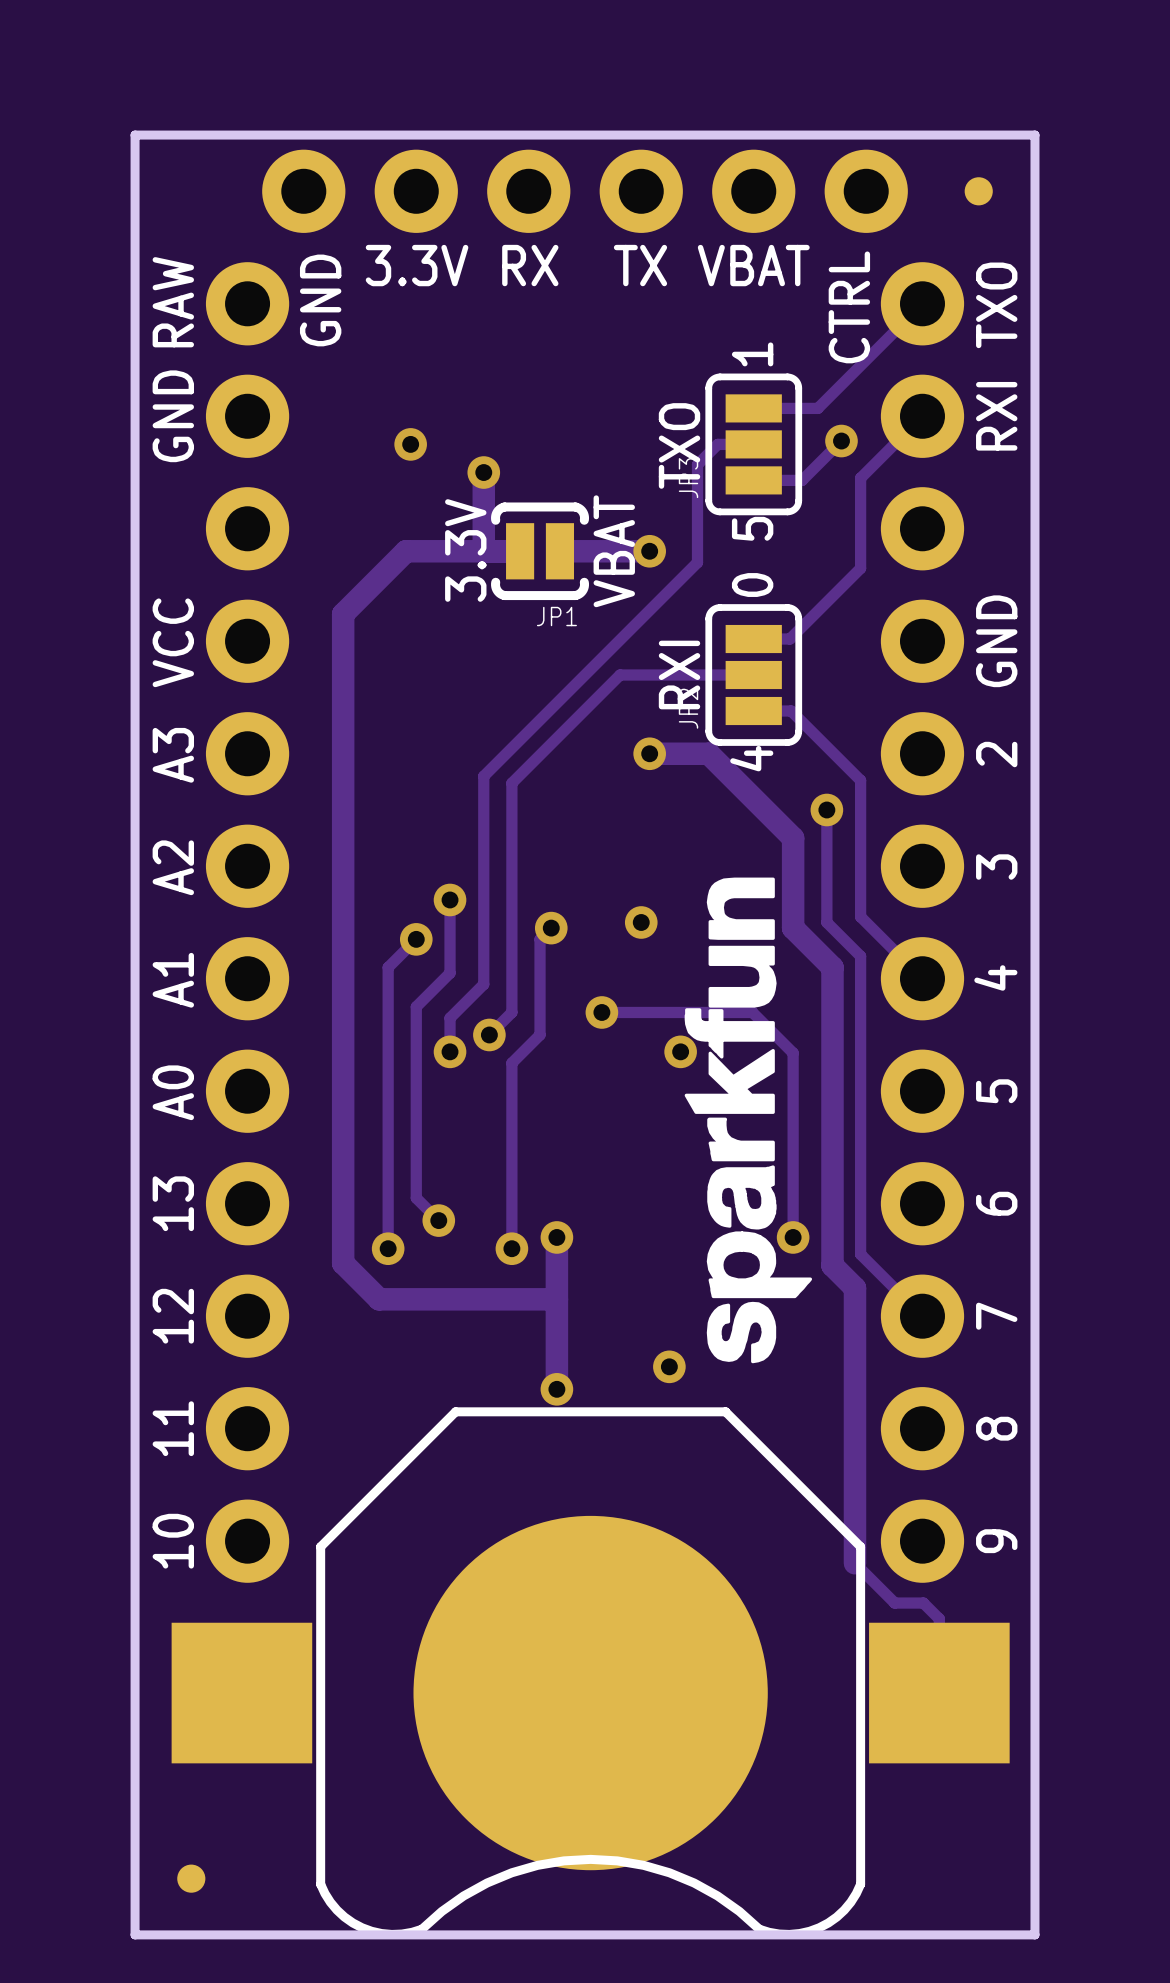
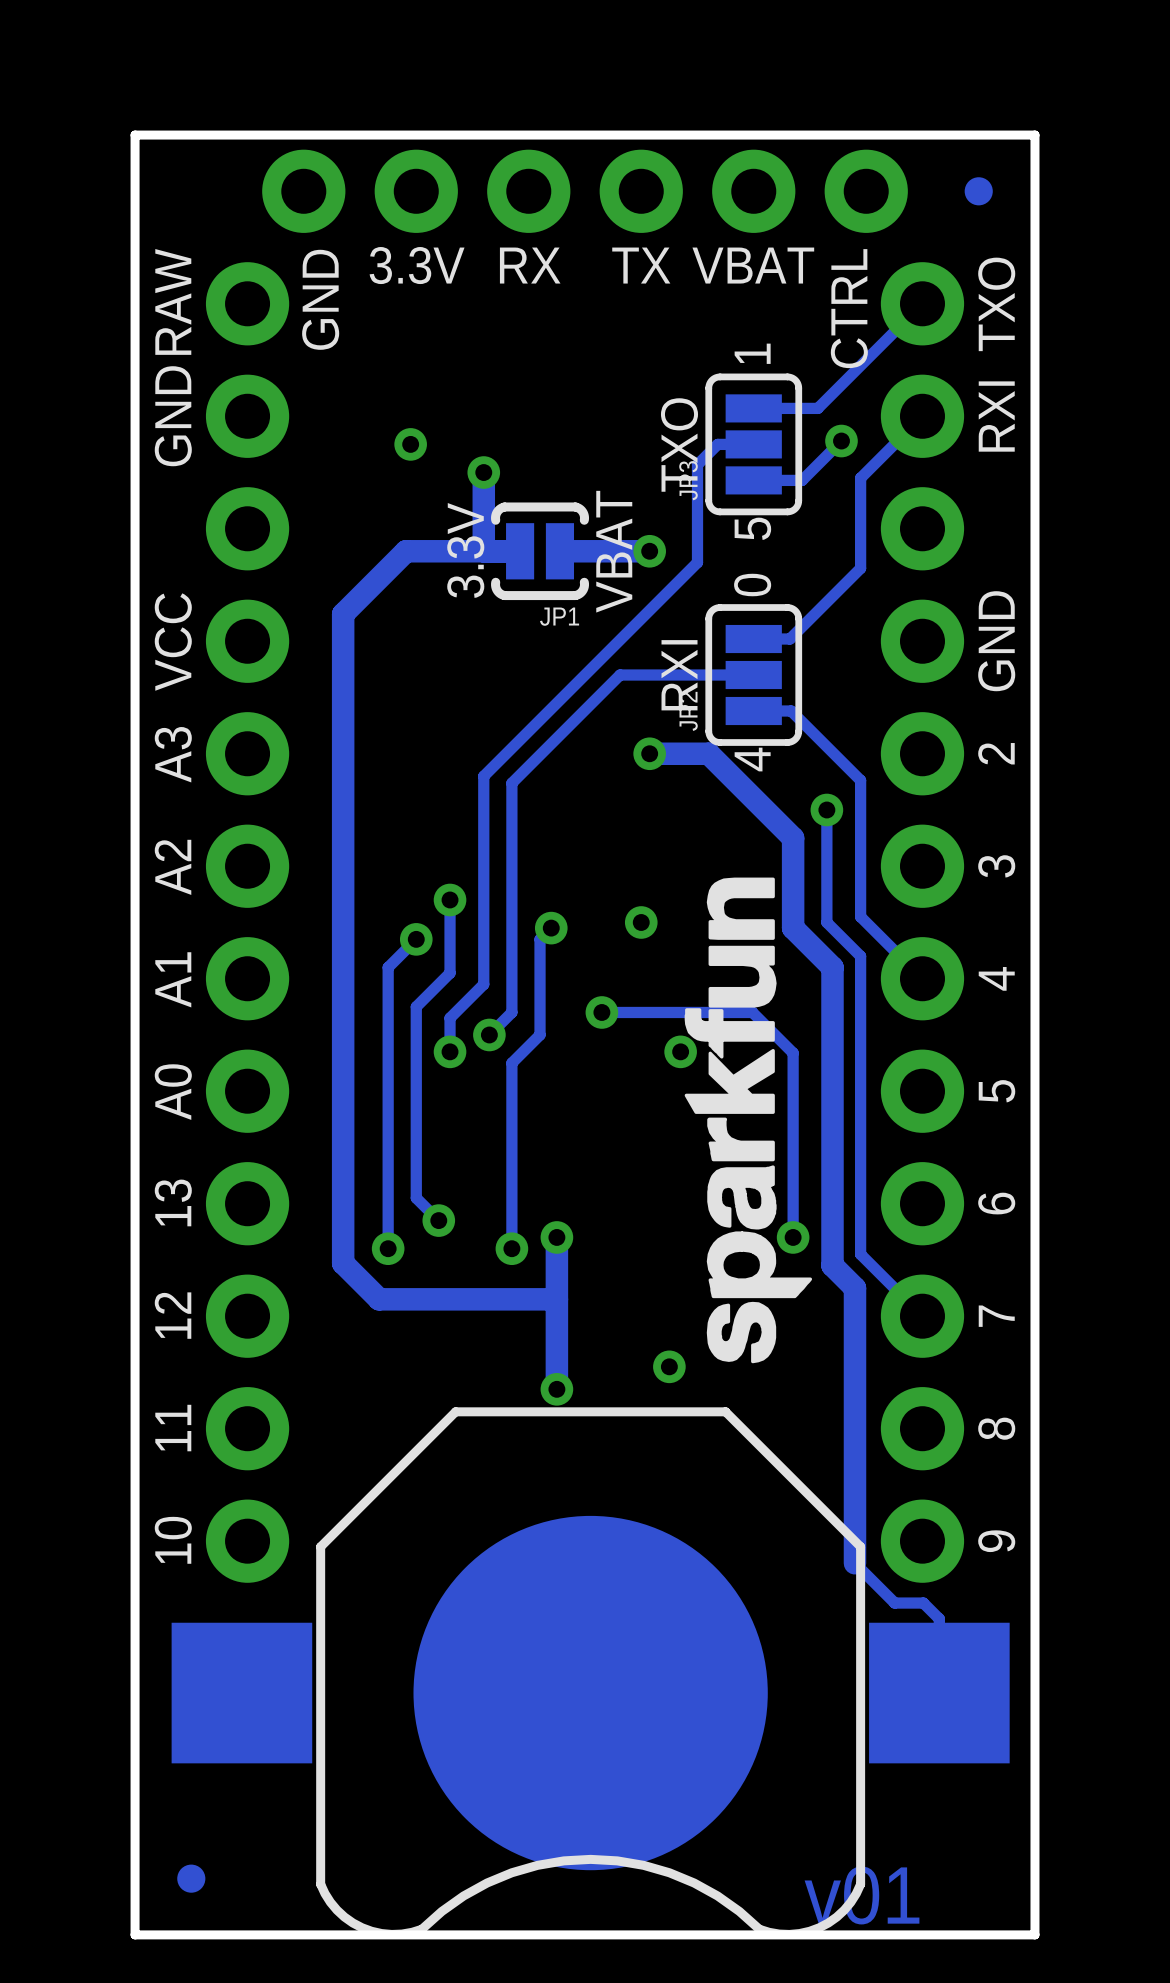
text: none -> v01 (862, 1895)

